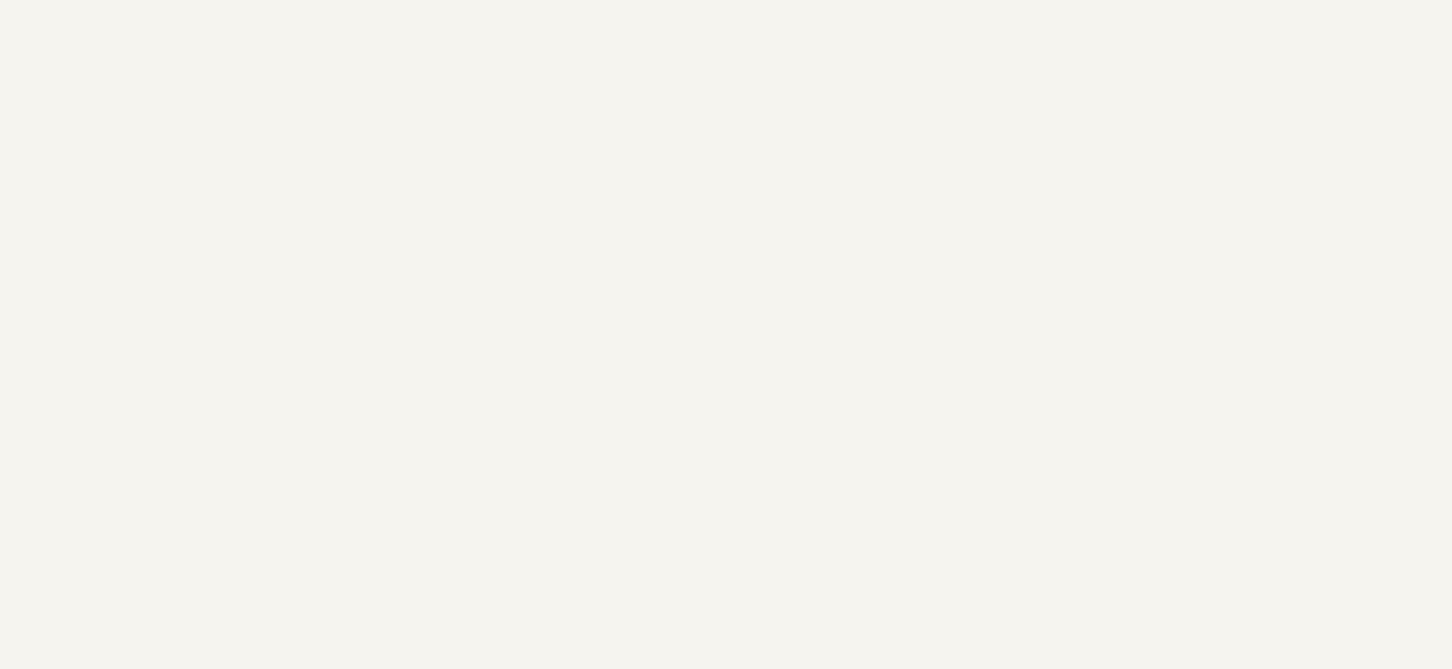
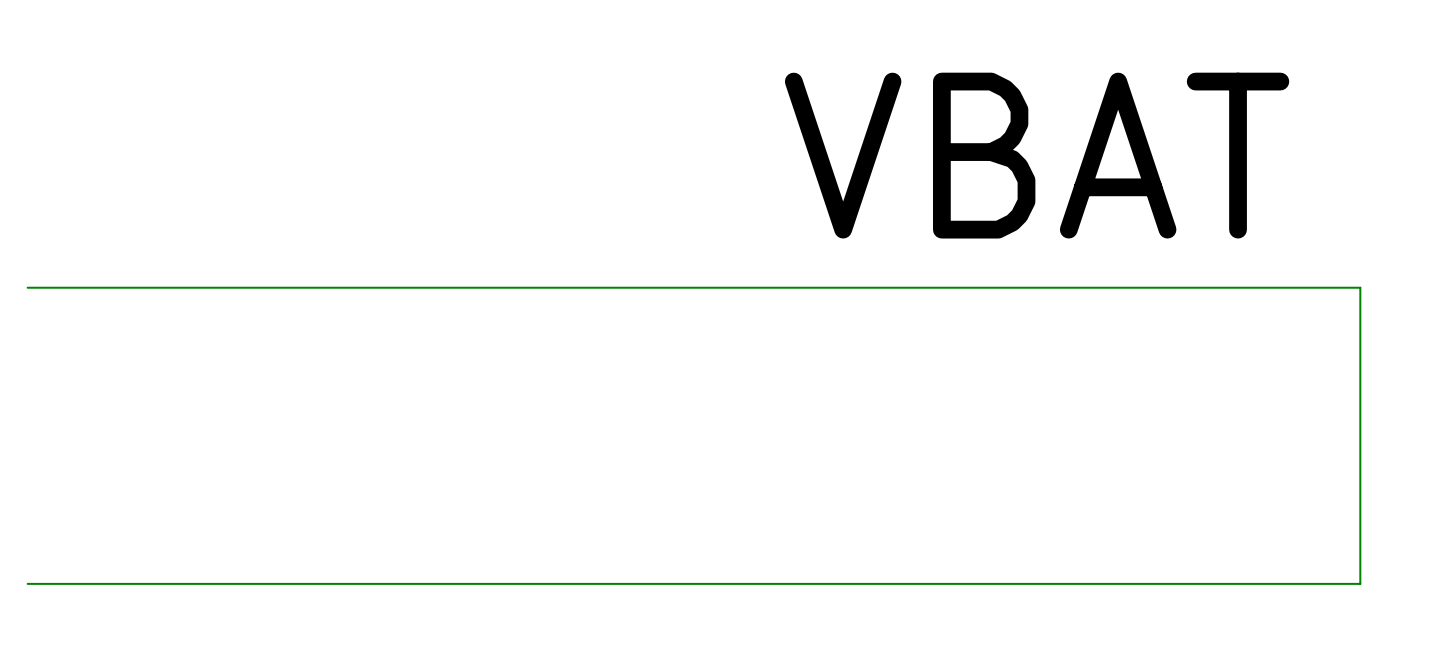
label: none -> VBAT (1037, 155)
wire: none -> (27, 287) (1360, 287) (1360, 583) (27, 583)

